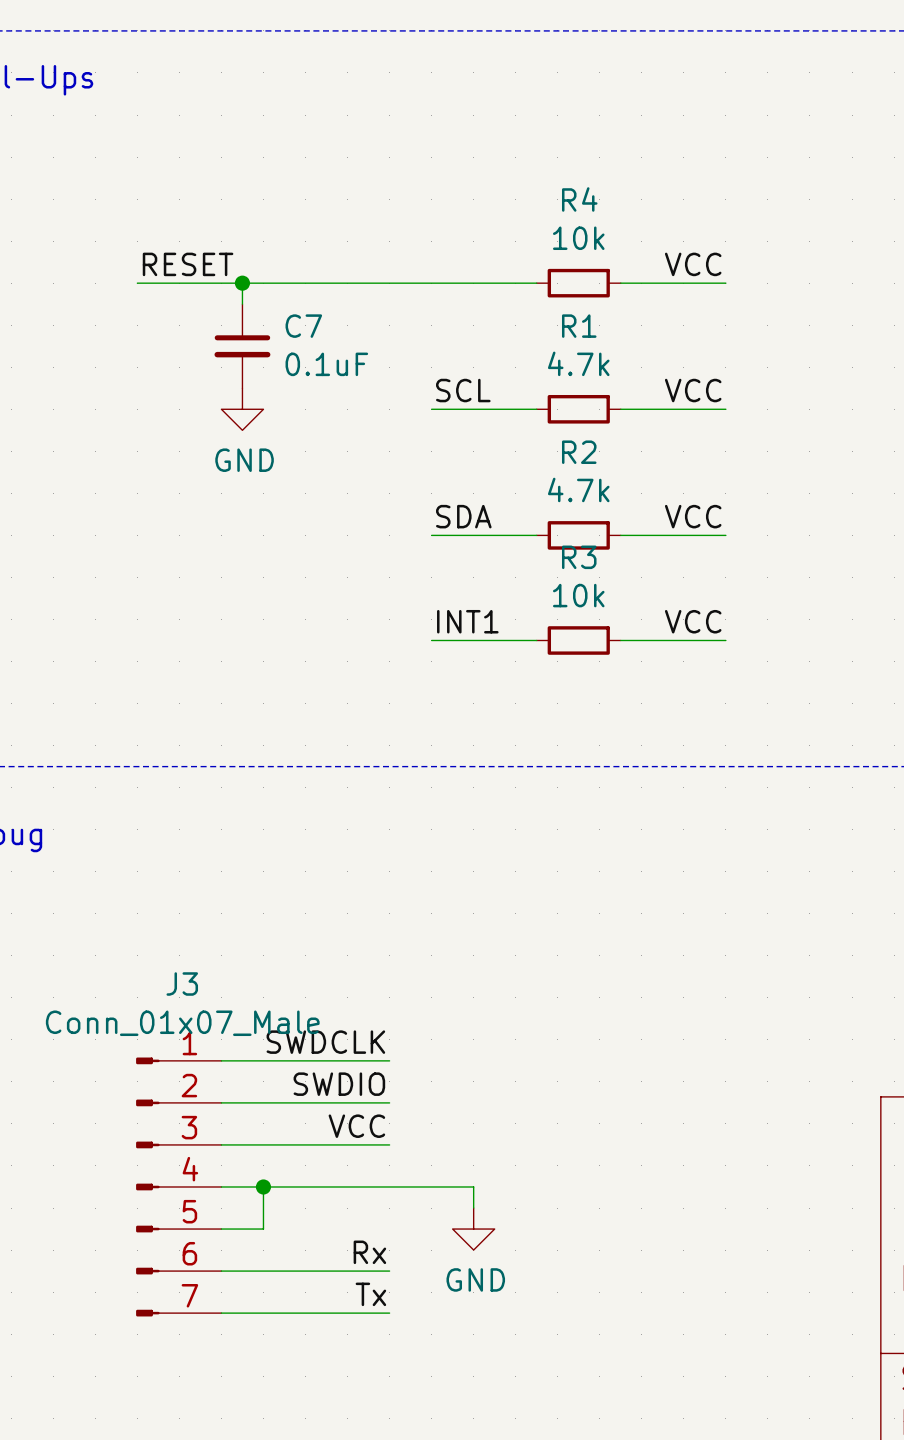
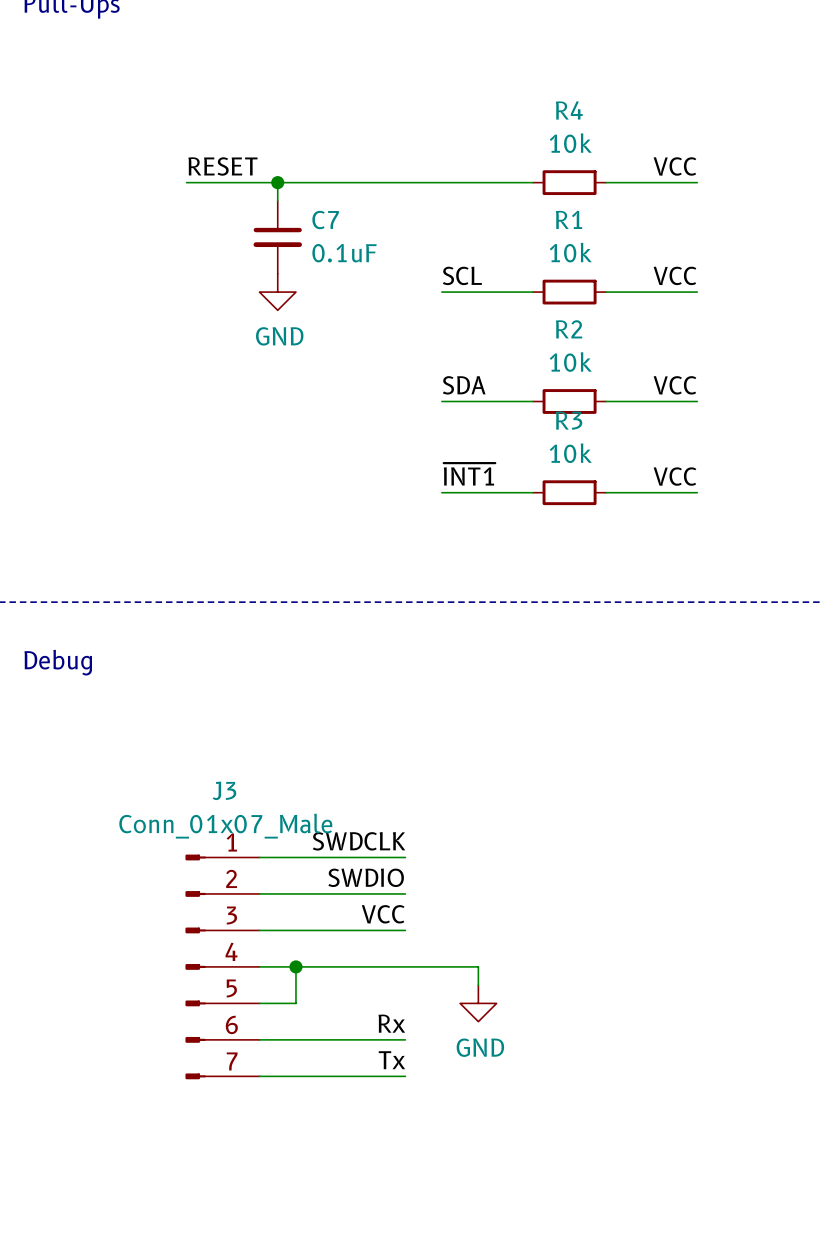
R1 value: 4.7k (578, 363) -> 10k (570, 252)
R2 value: 4.7k (578, 489) -> 10k (570, 362)
label: INT1 (467, 621) -> ~{INT1} (469, 474)

